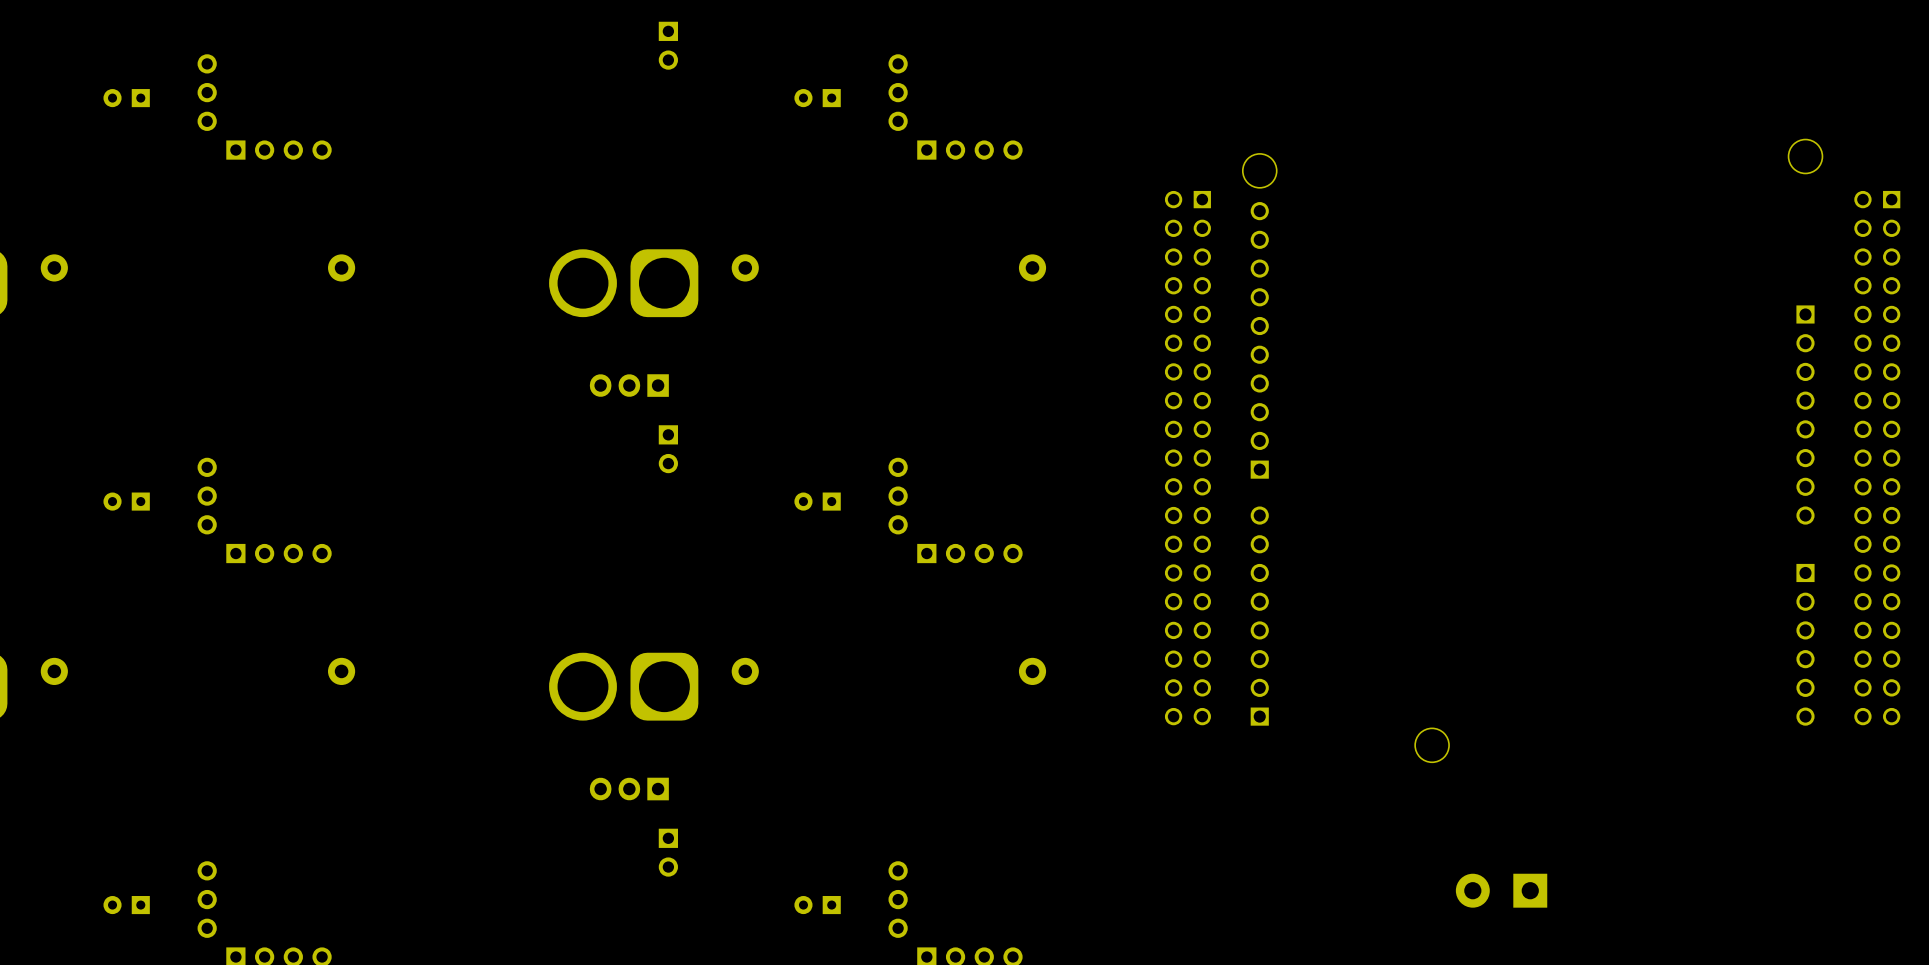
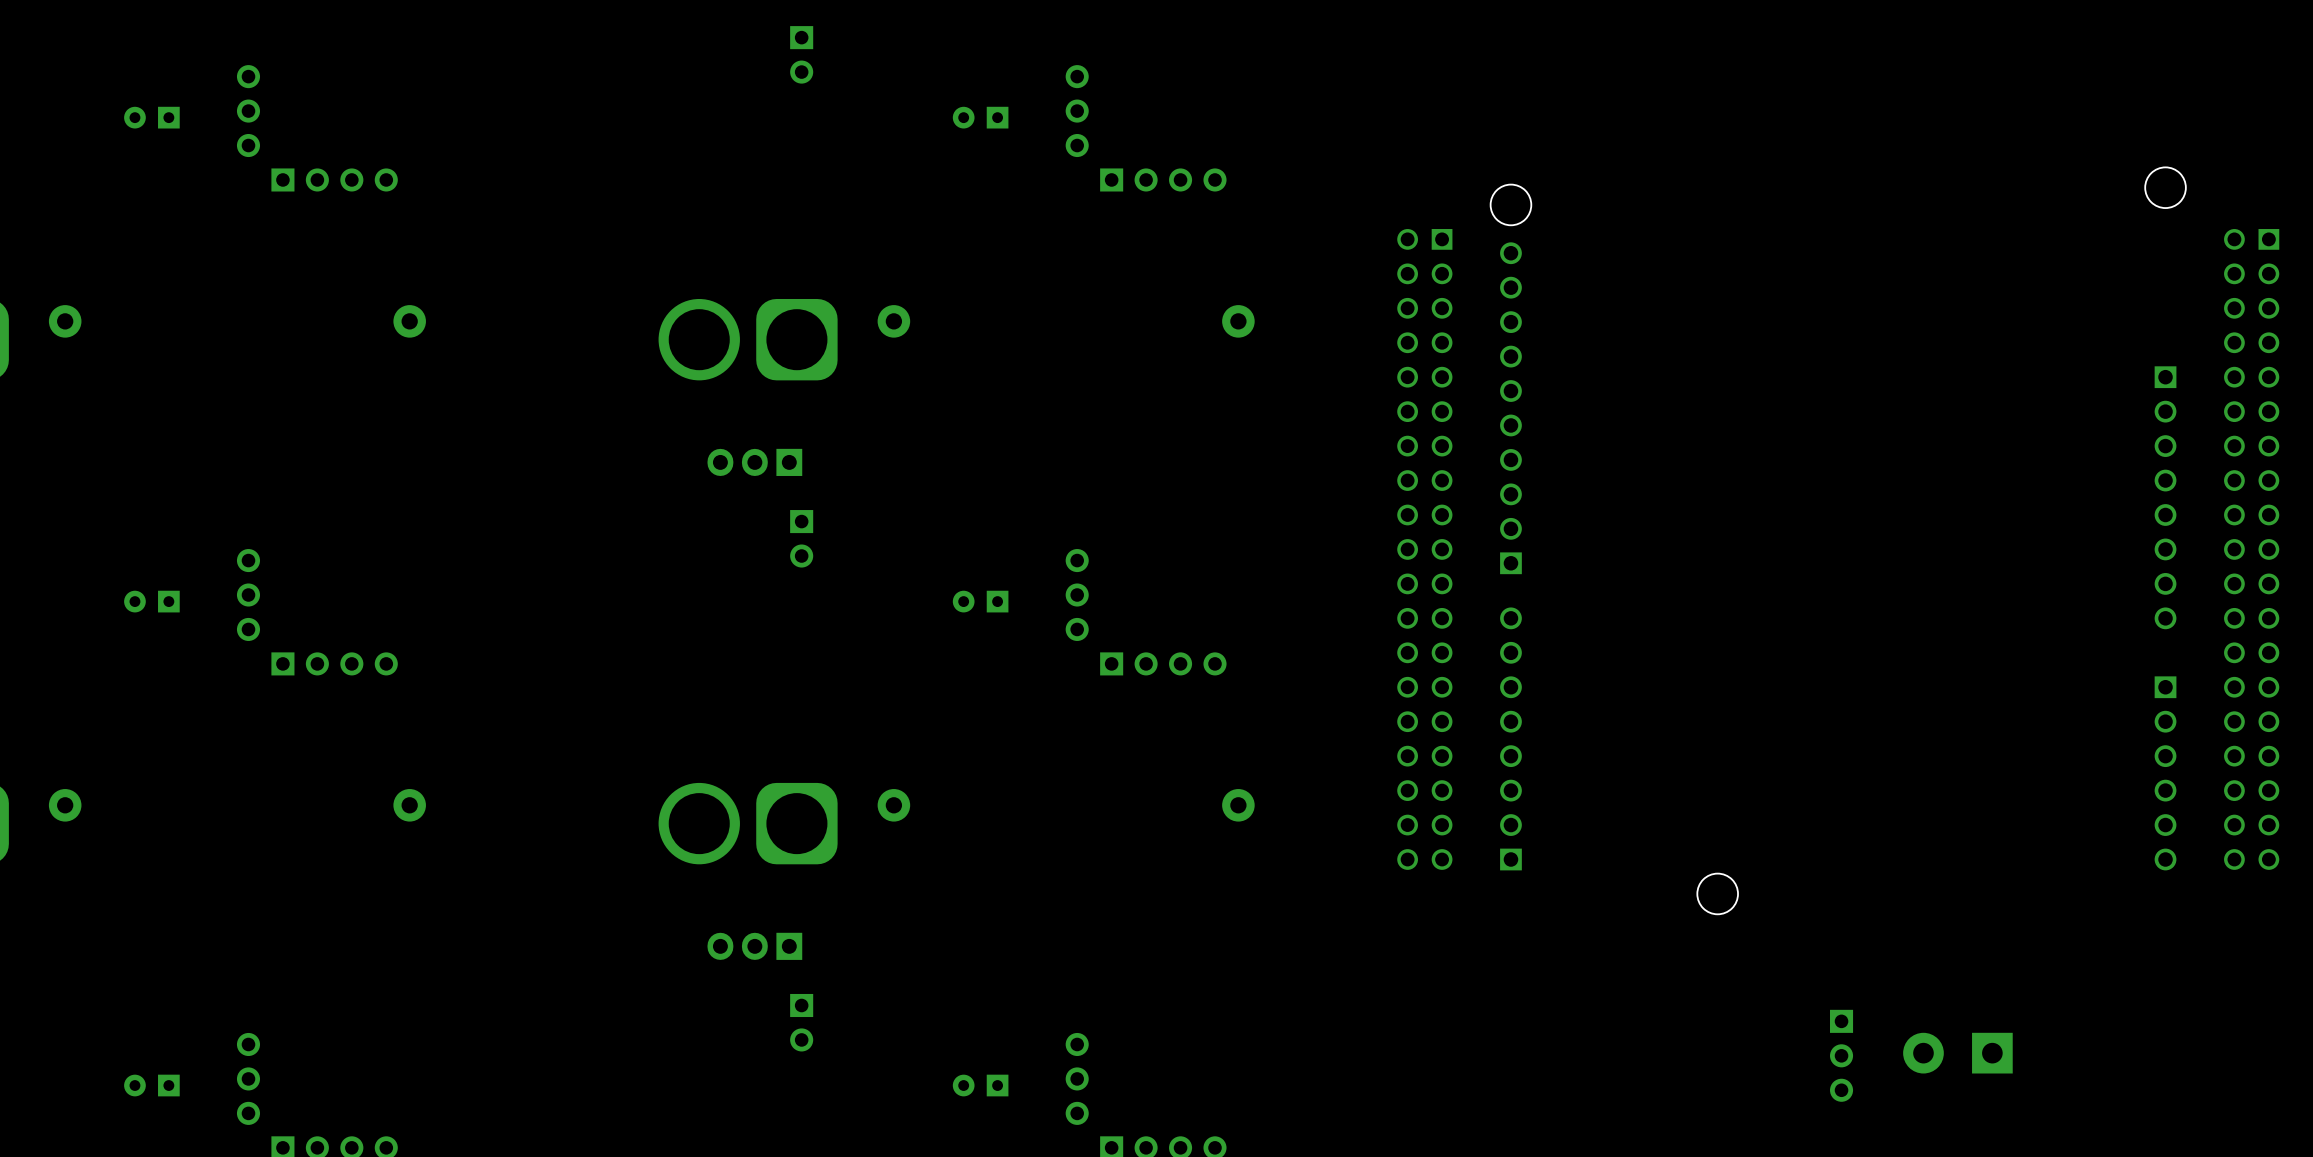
part: none -> (1841, 1055)
part position: (1501, 890) -> (1957, 1053)

